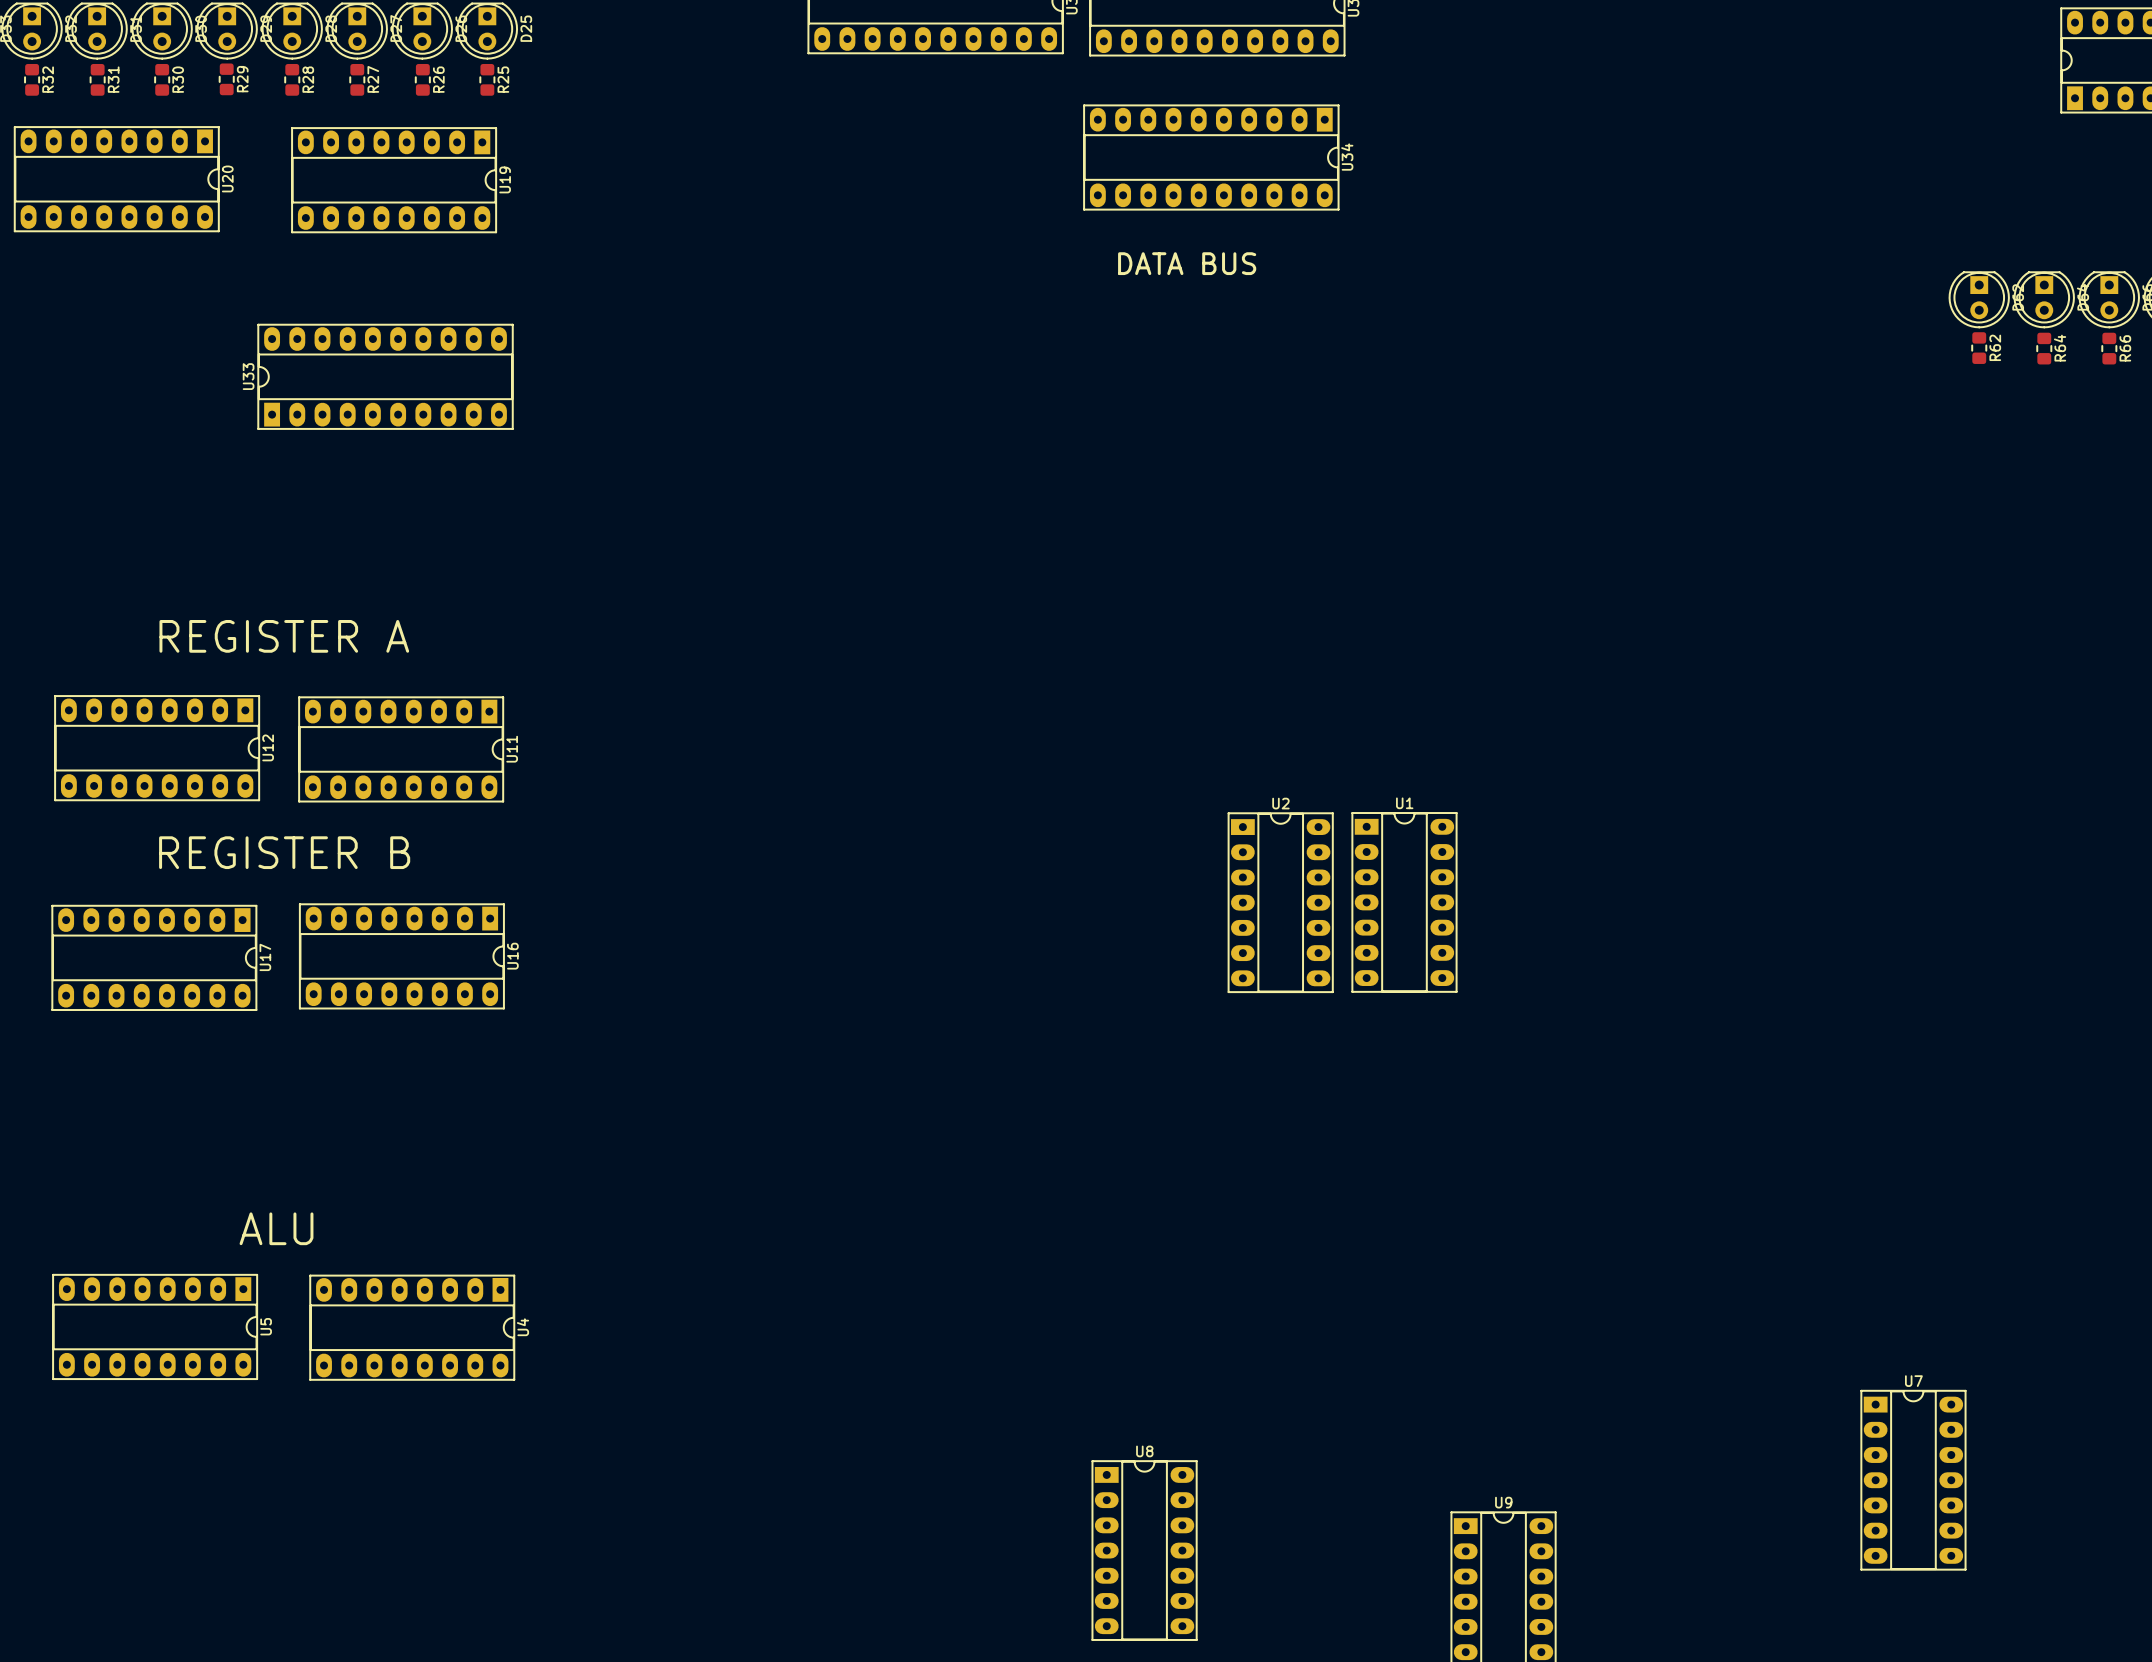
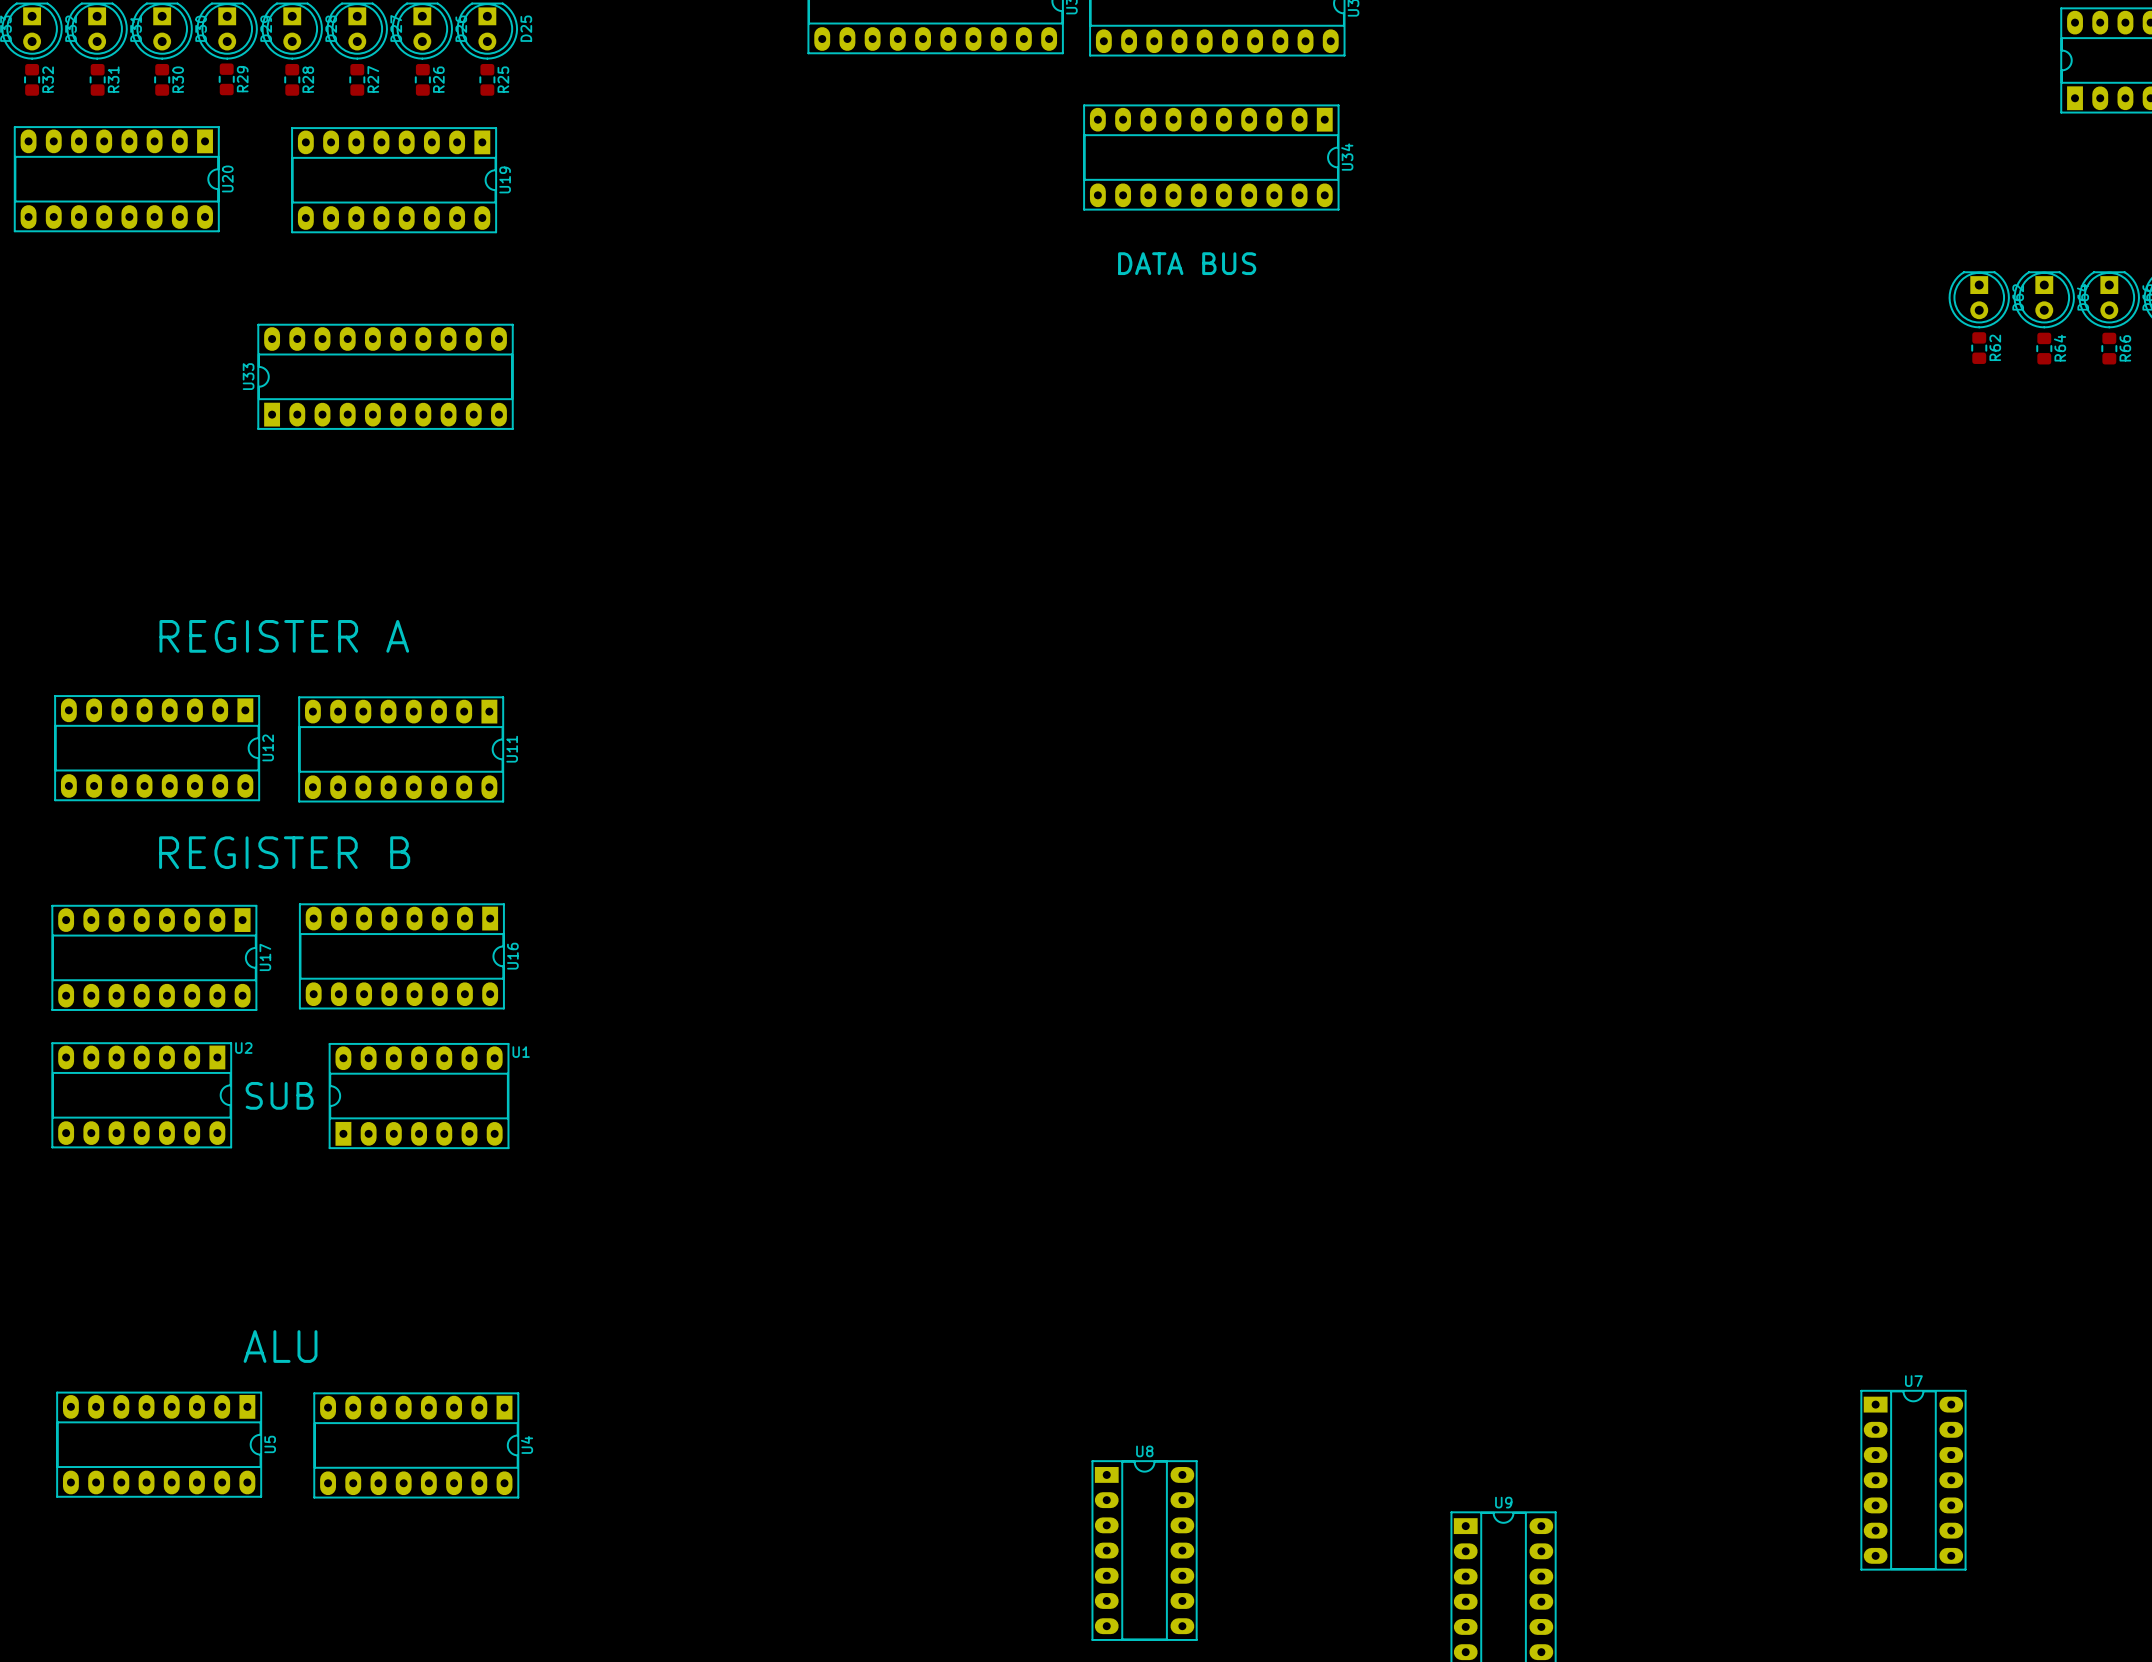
U2 name position: U2 (1280, 803) -> U2 (243, 1048)
U1 name position: U1 (1404, 803) -> U1 (521, 1052)
U2 rotation: 0° (1280, 902) -> 90° clockwise (141, 1095)
U2 position: (1280, 902) -> (141, 1095)
U1 rotation: 0° (1404, 902) -> 90° counterclockwise (419, 1096)
U1 position: (1404, 902) -> (419, 1096)
text: none -> SUB (279, 1095)
text position: ALU (276, 1228) -> ALU (280, 1346)
U5 position: (155, 1326) -> (159, 1444)
U4 position: (412, 1327) -> (416, 1445)

